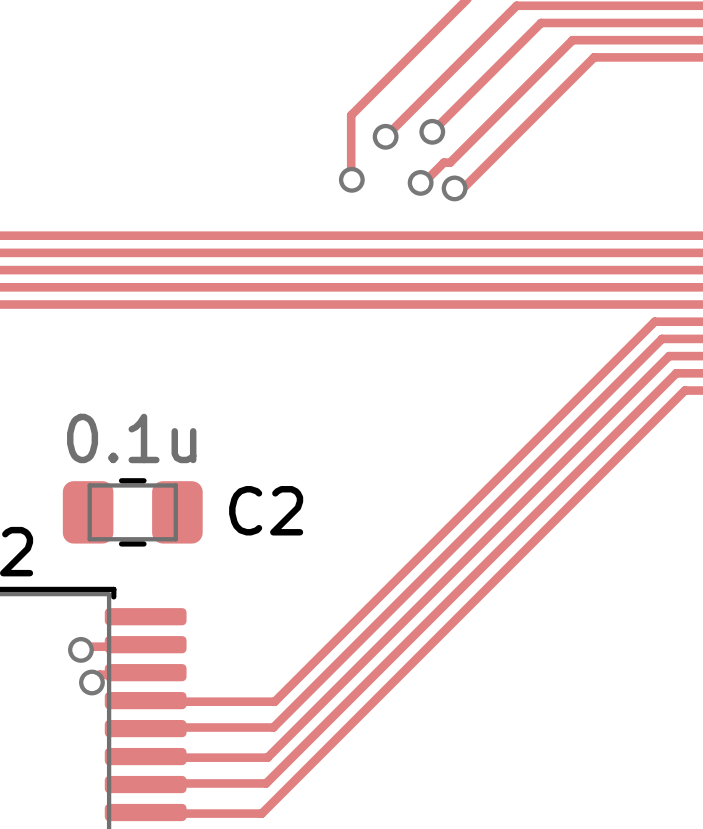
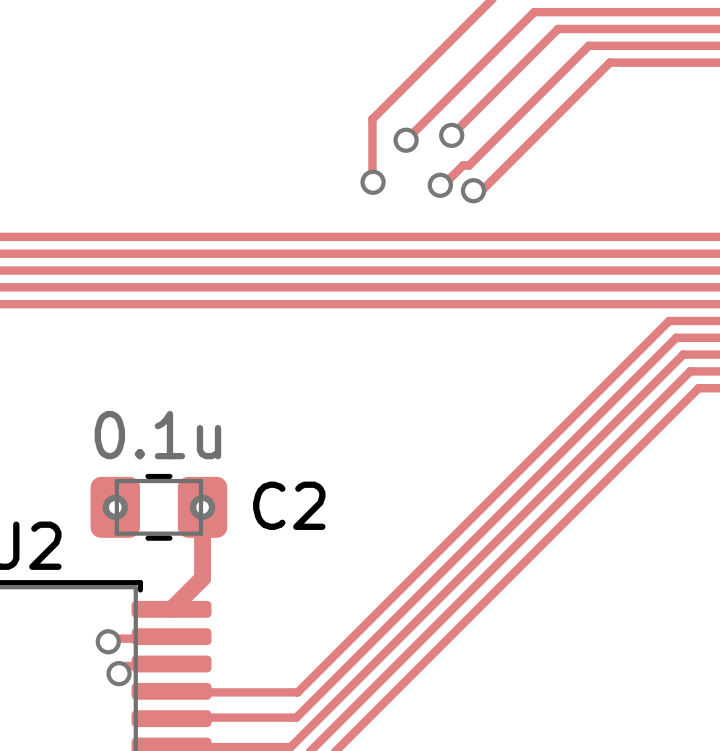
via: none -> (115, 507)
track: none -> (202, 507) (202, 578) (171, 609)
via: none -> (202, 507)

